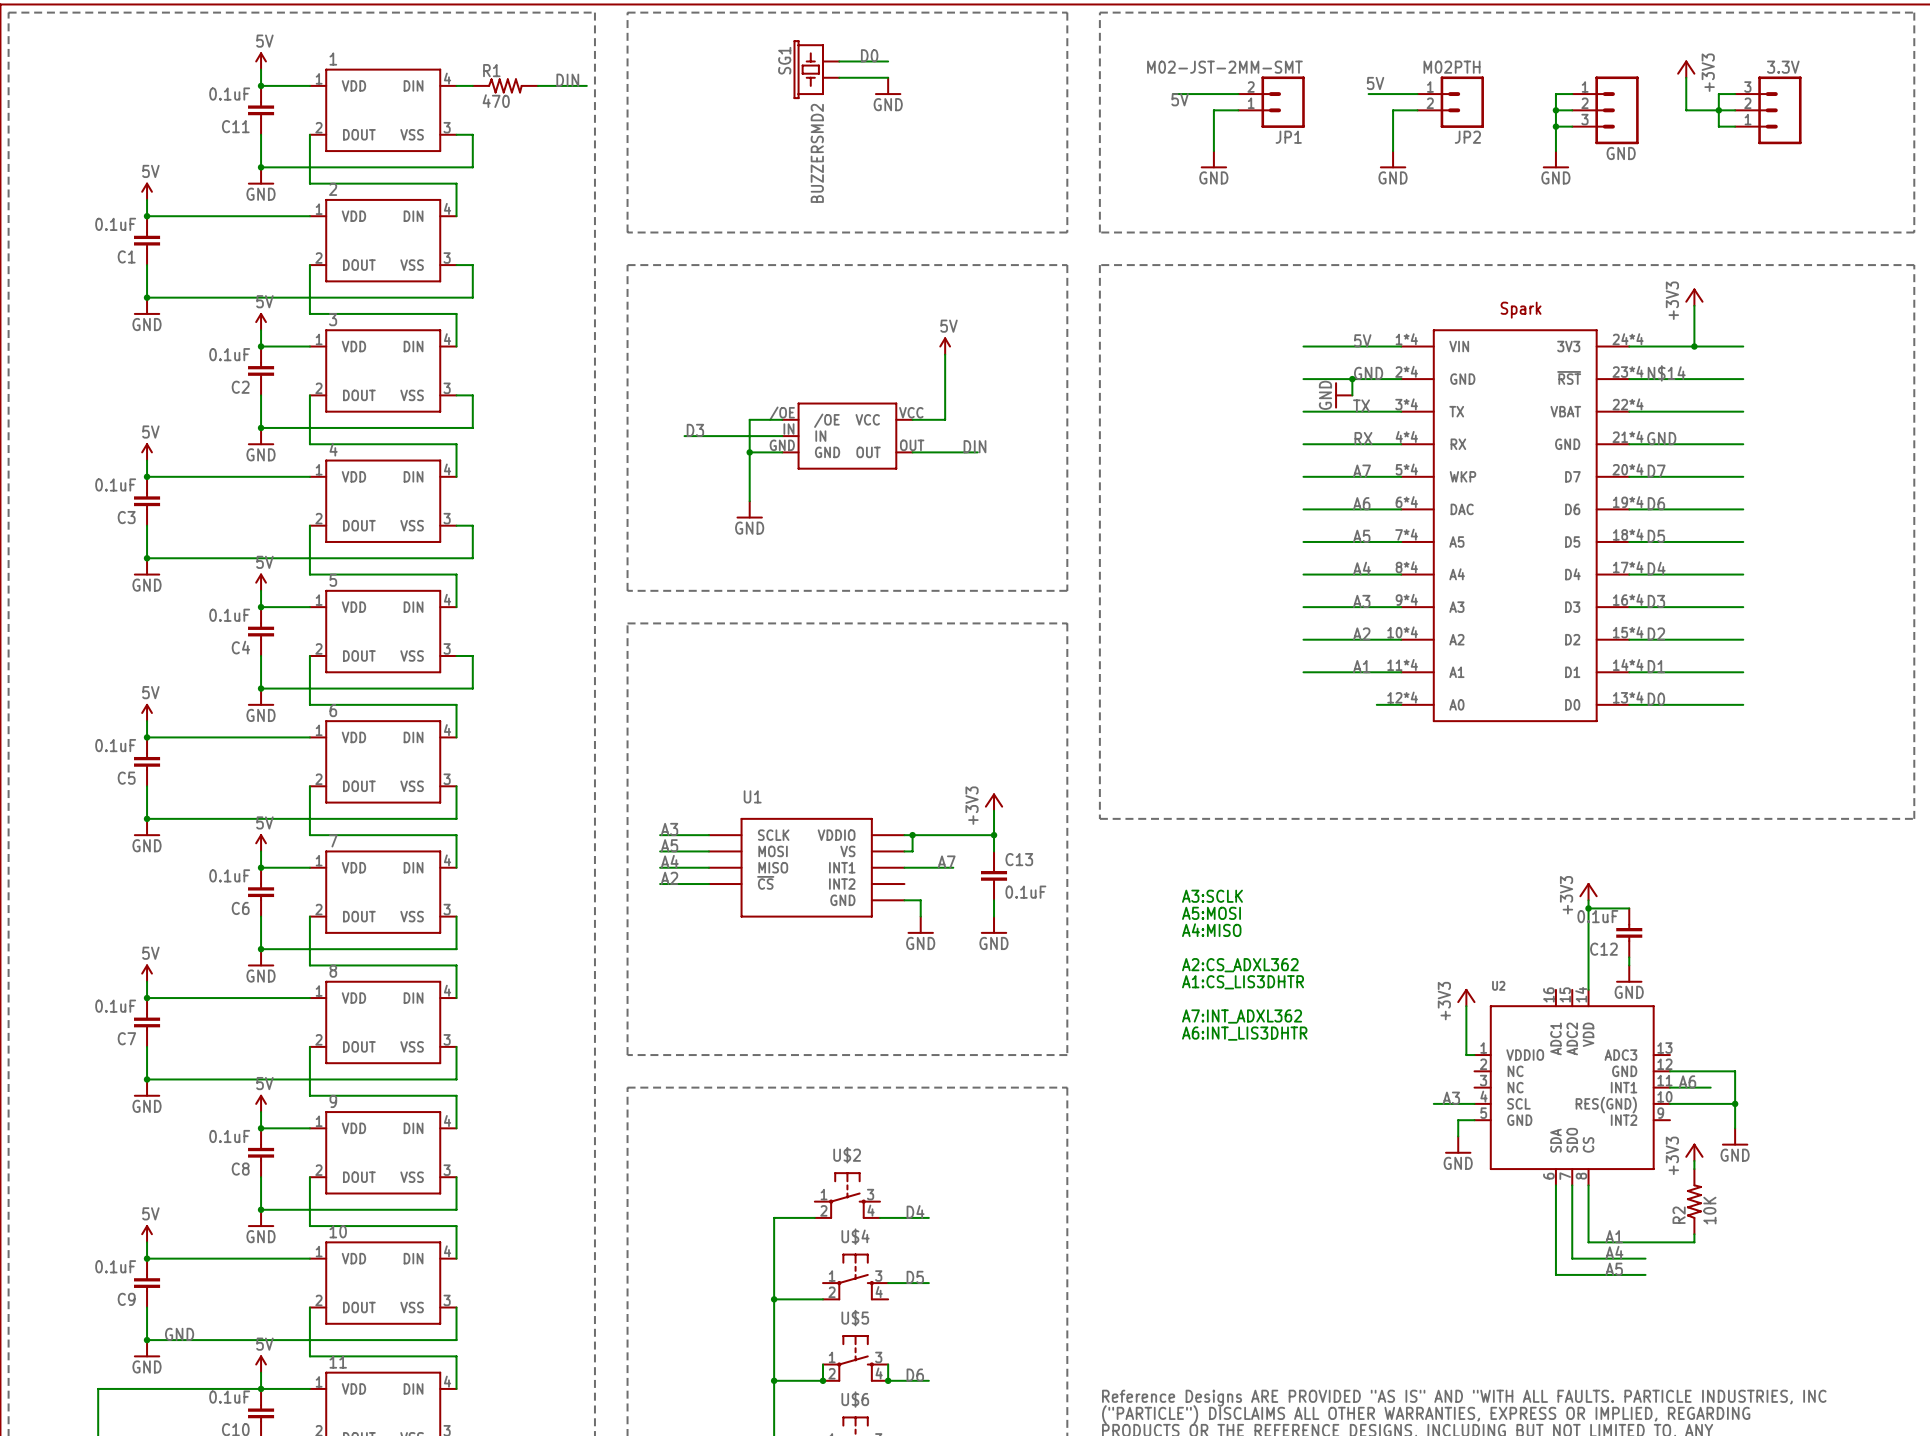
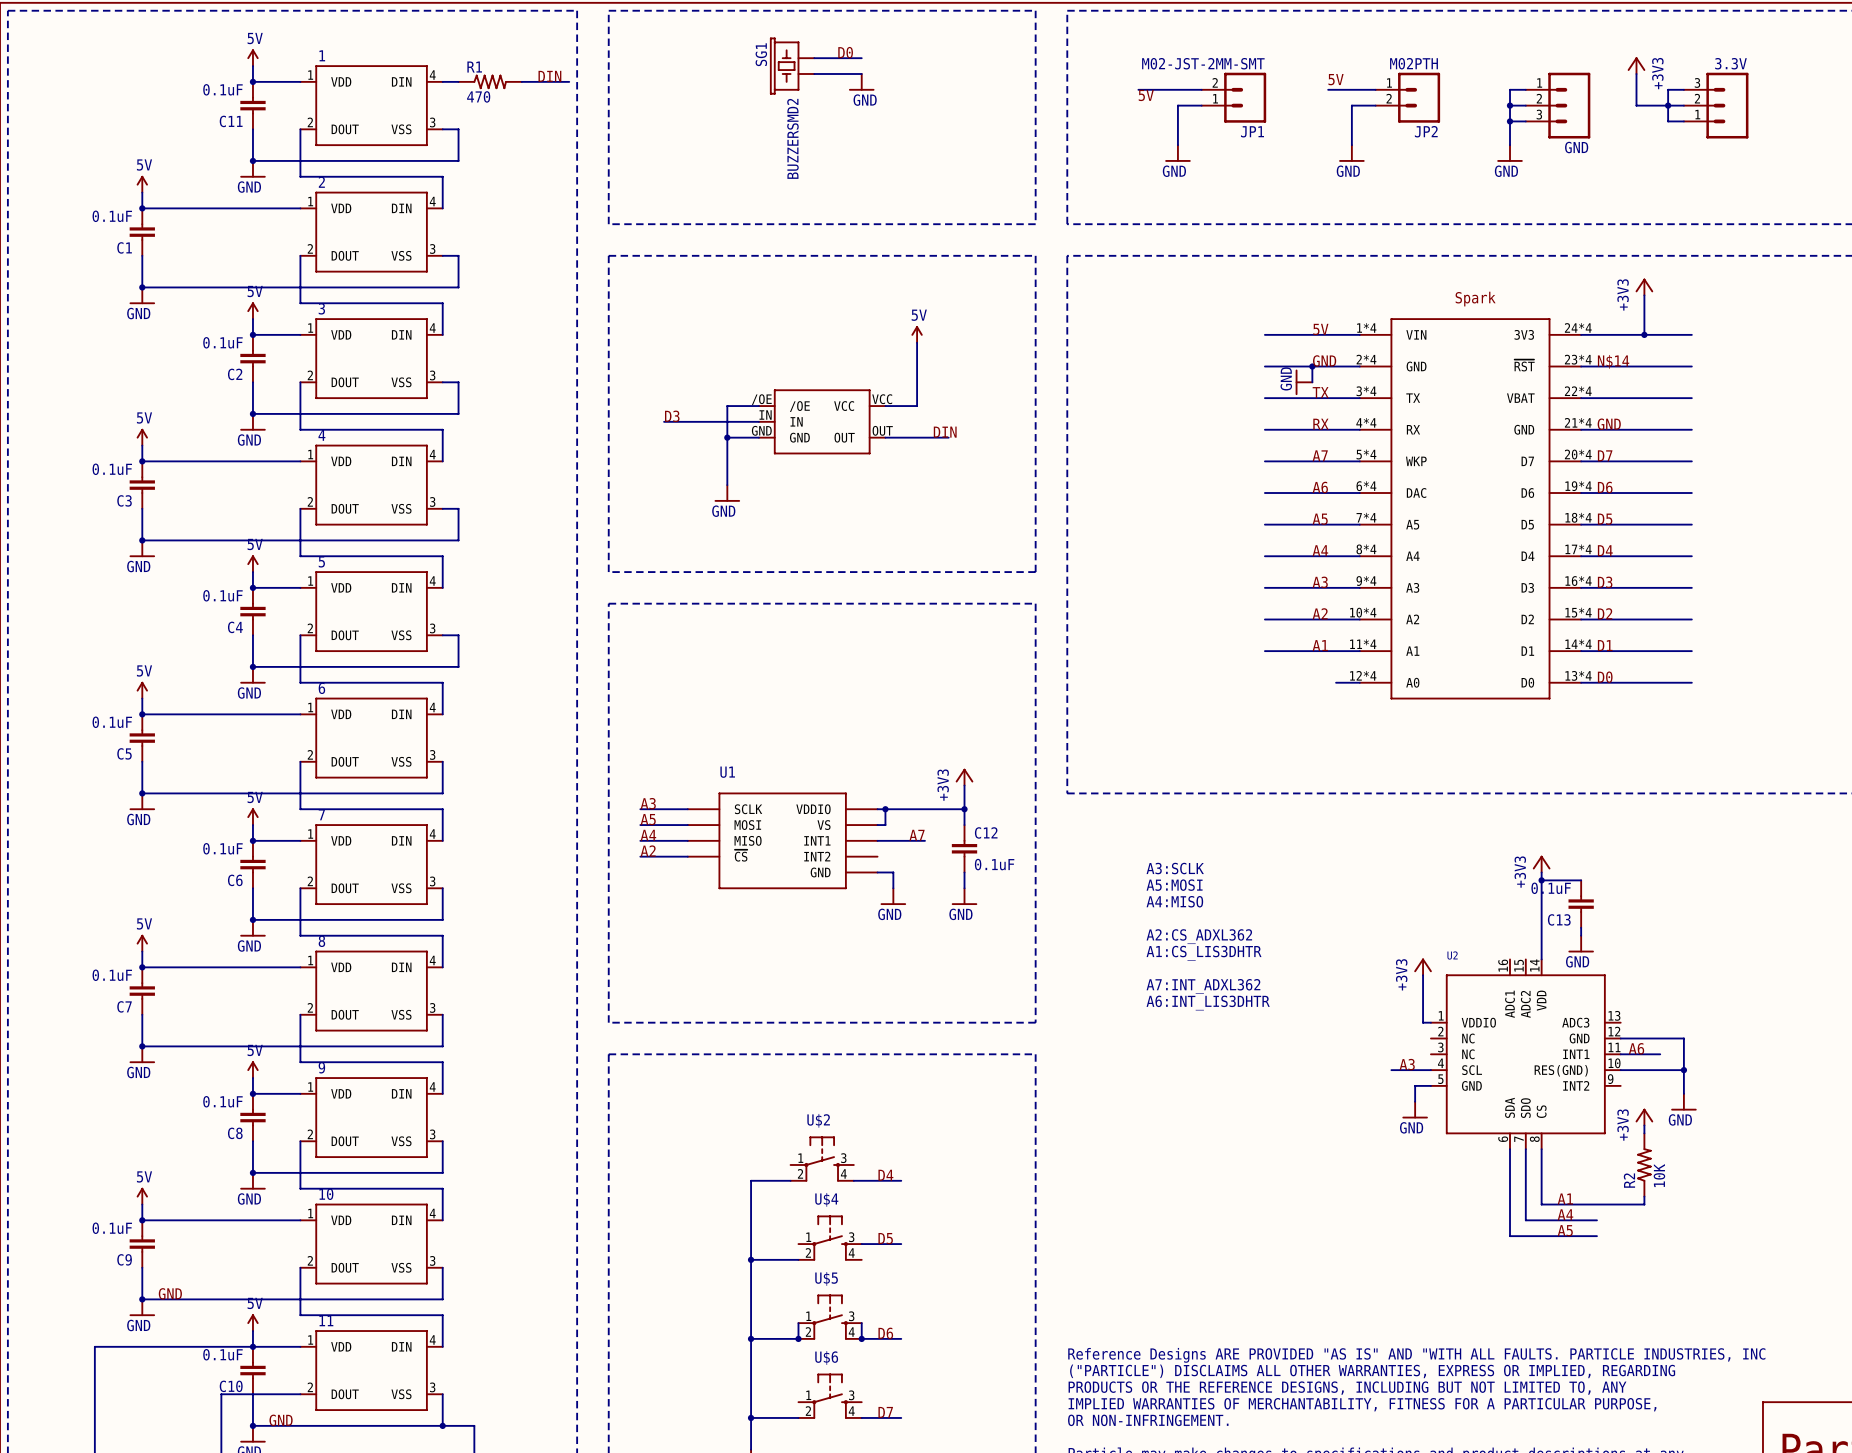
C13 name: C13 (1019, 859) -> C12 (986, 832)
C12 name: C12 (1603, 949) -> C13 (1559, 919)

